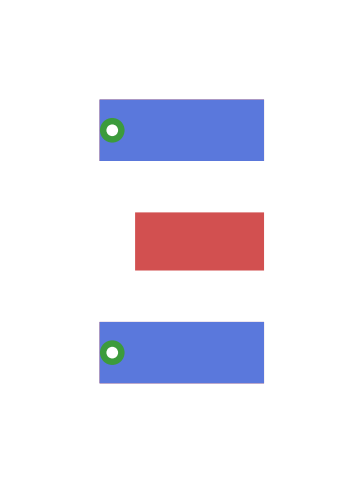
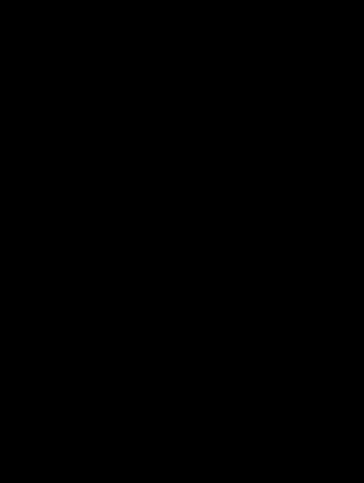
part: (181, 241) -> none

